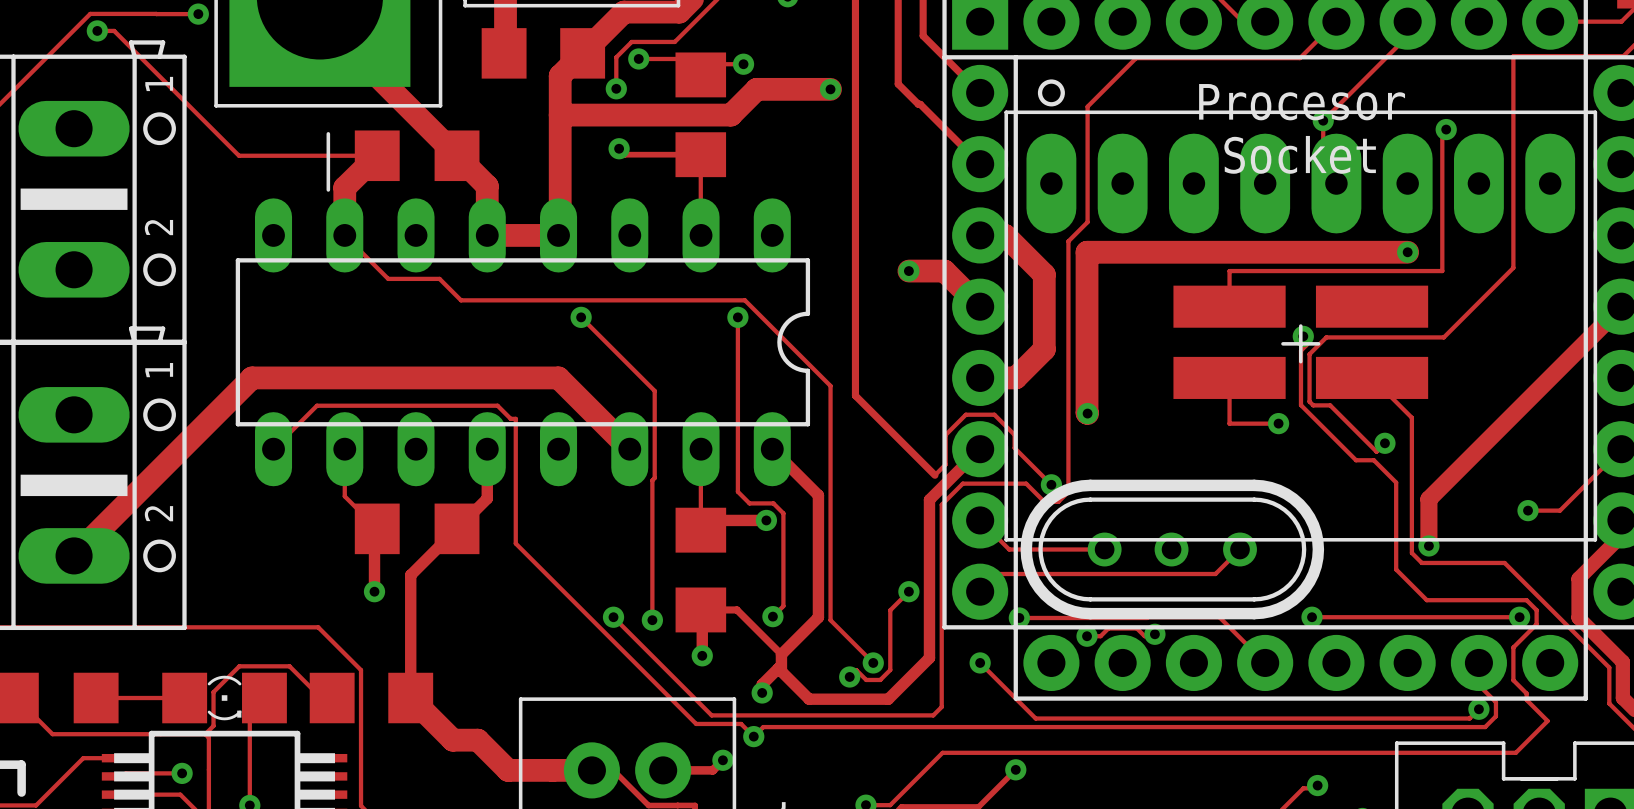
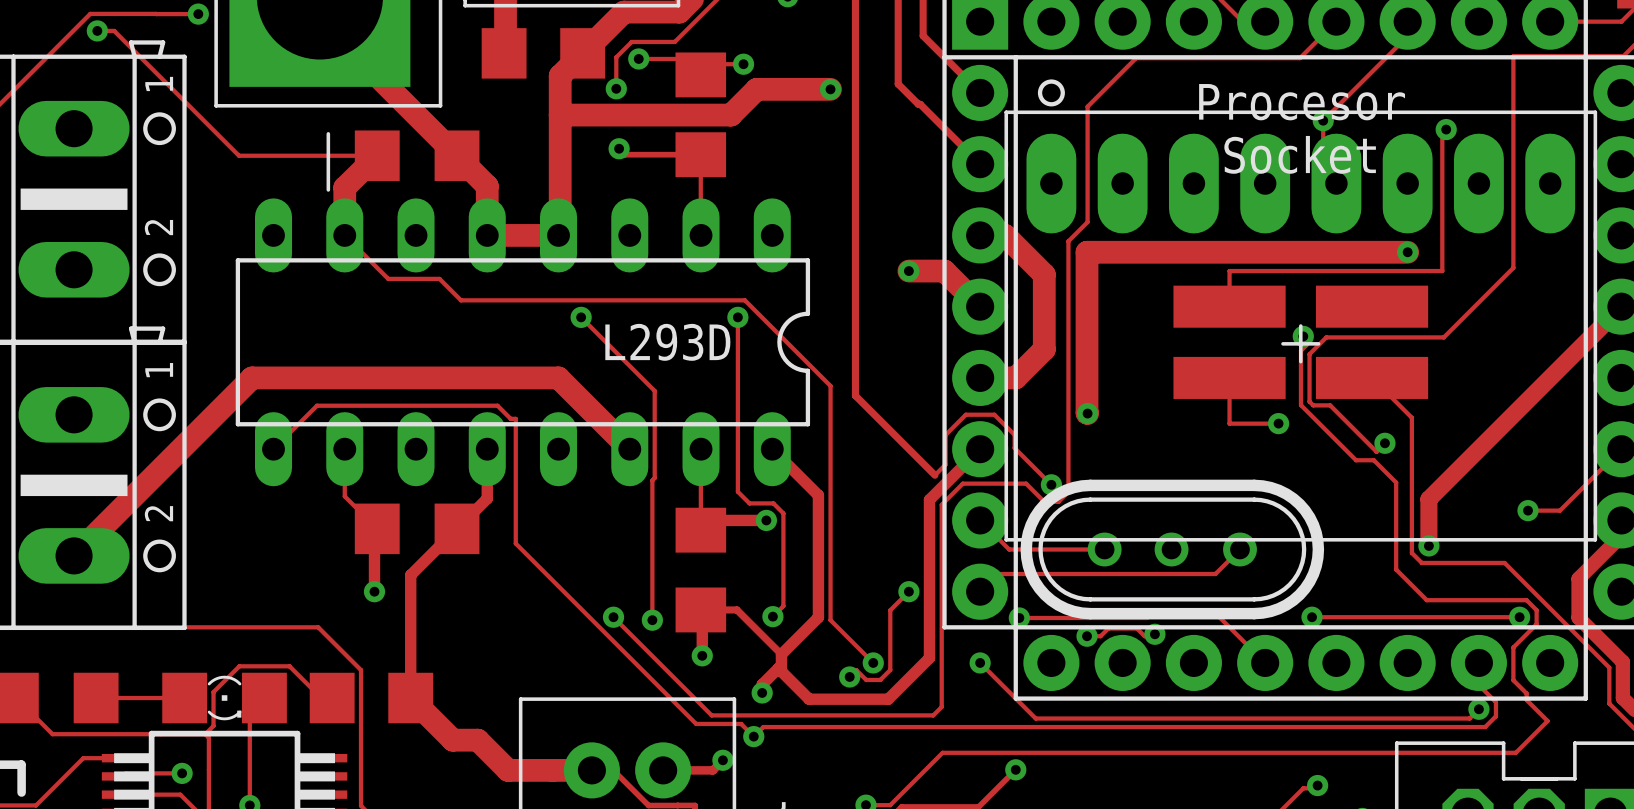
part value: none -> L293D (667, 342)

